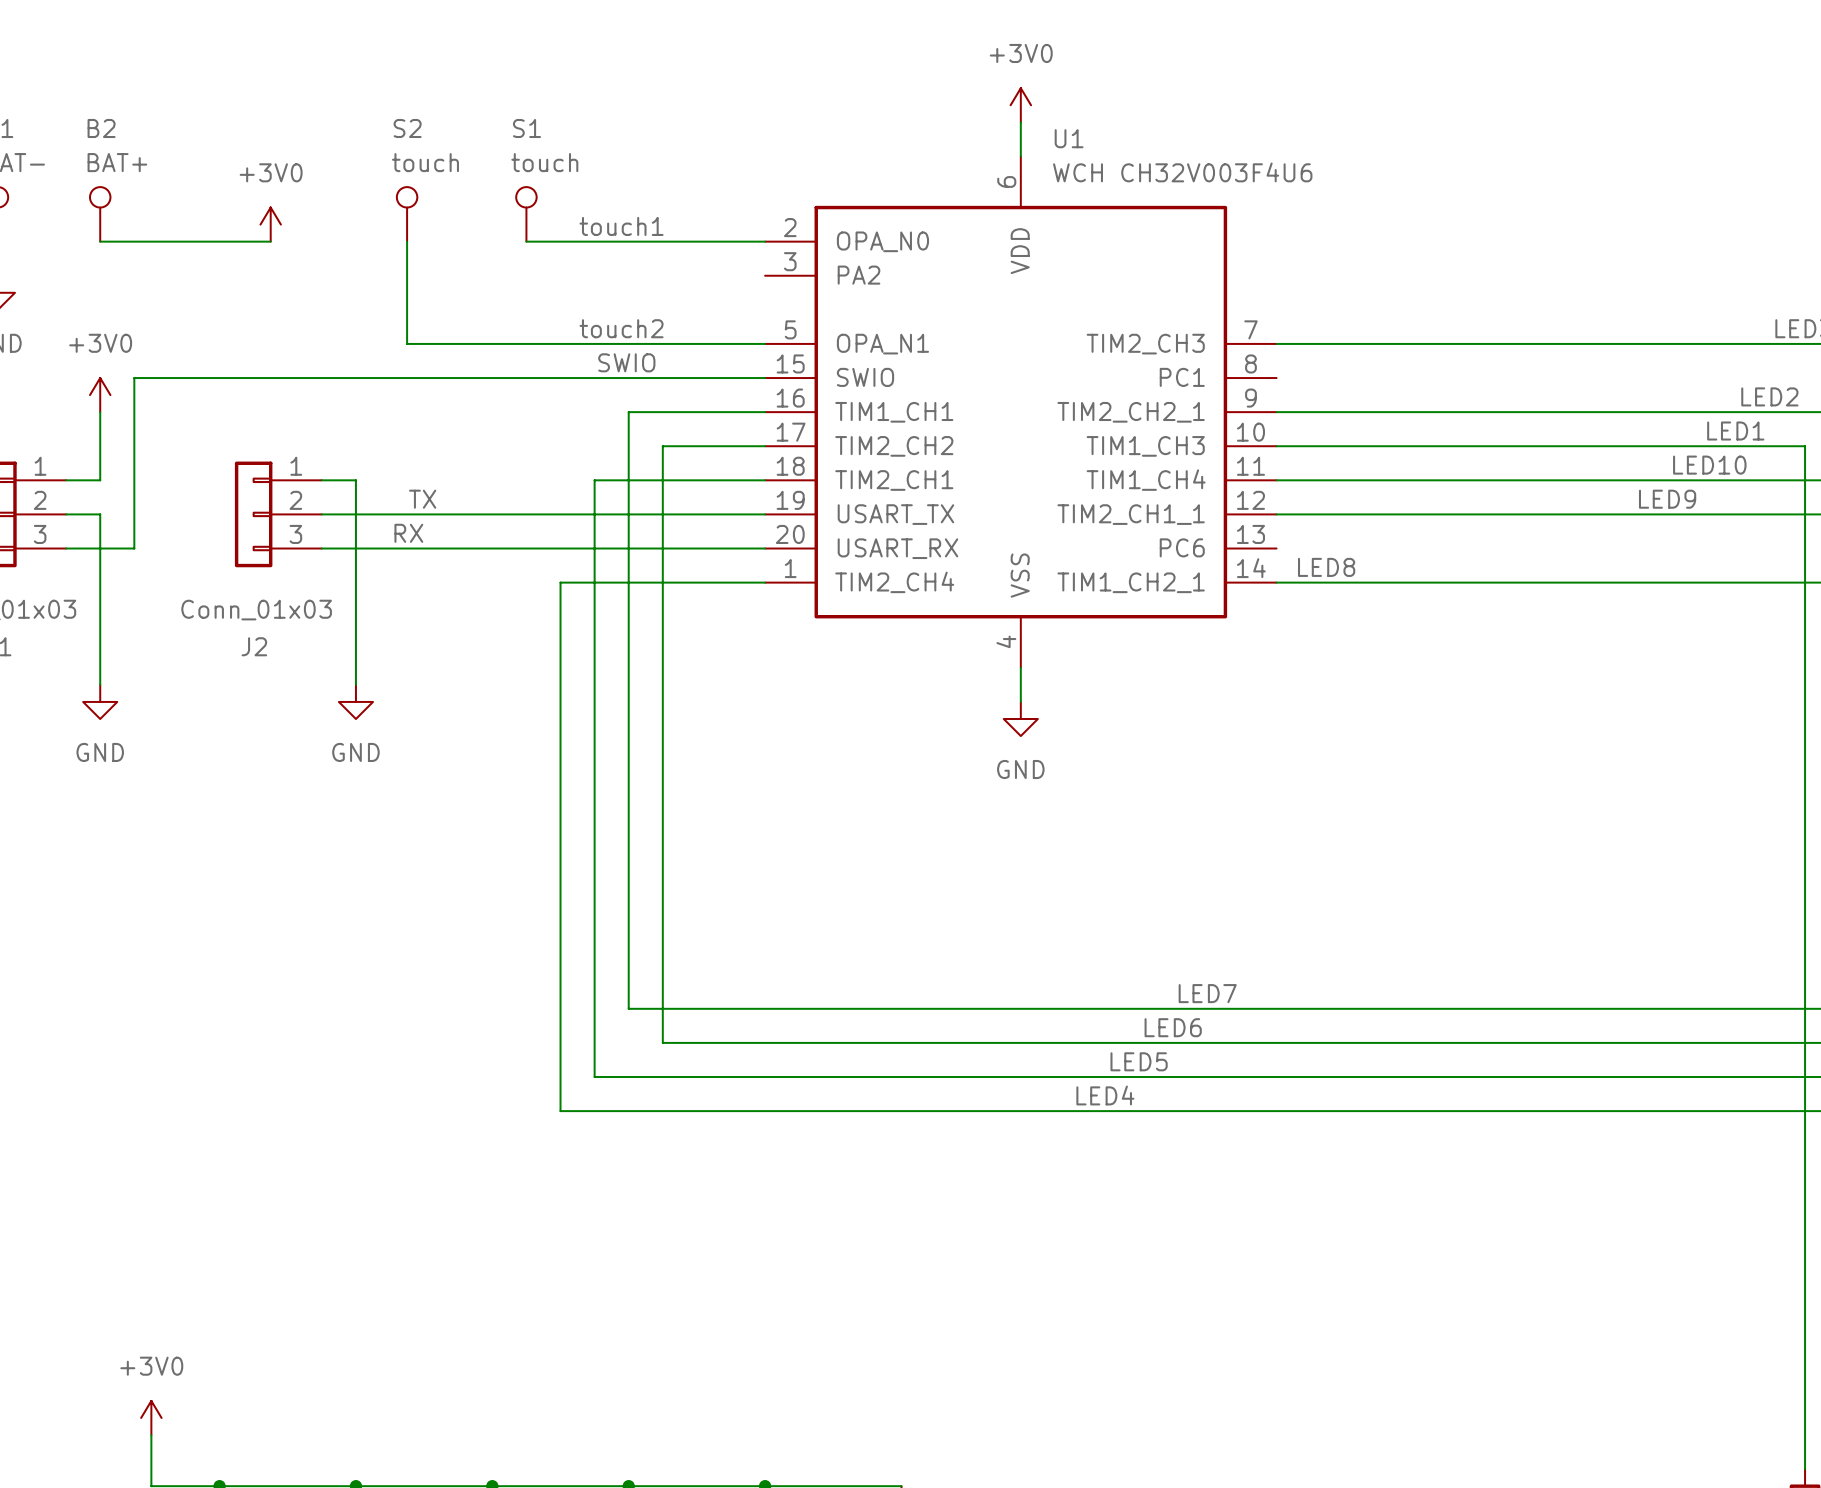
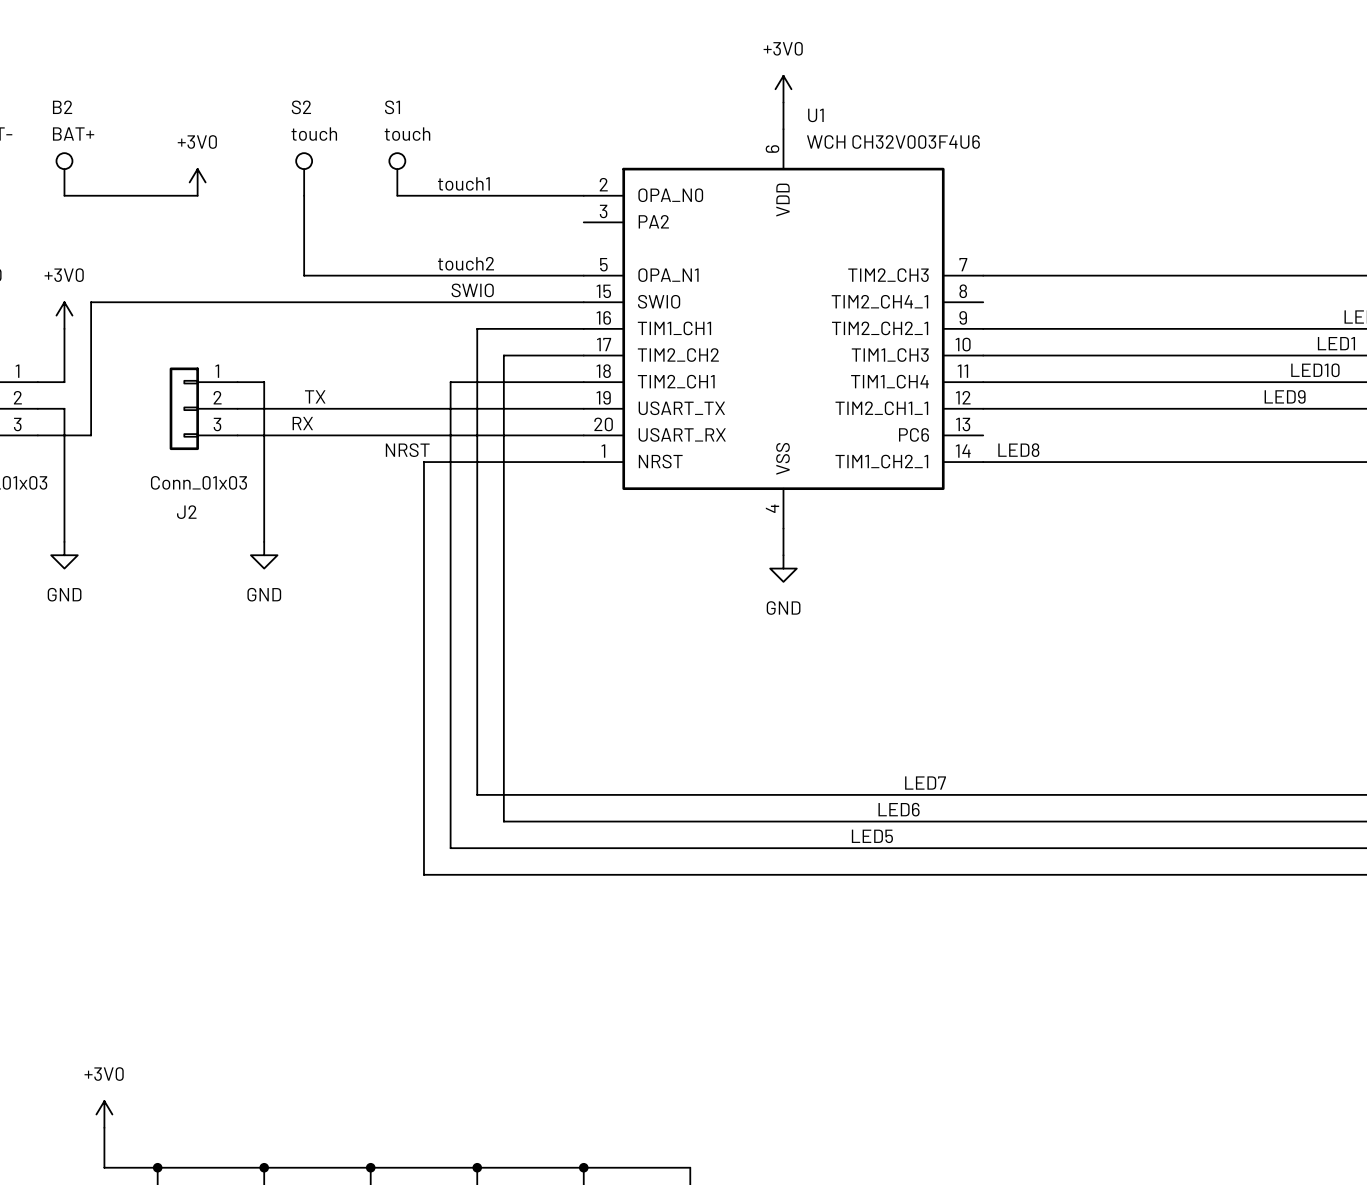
U1 pin name: PC1 (1182, 377) -> TIM2_CH4_1 (879, 301)
label: none -> NRST (407, 450)
U1 pin name: TIM2_CH4 (894, 582) -> NRST (660, 461)
label: LED4 (1105, 1095) -> none

